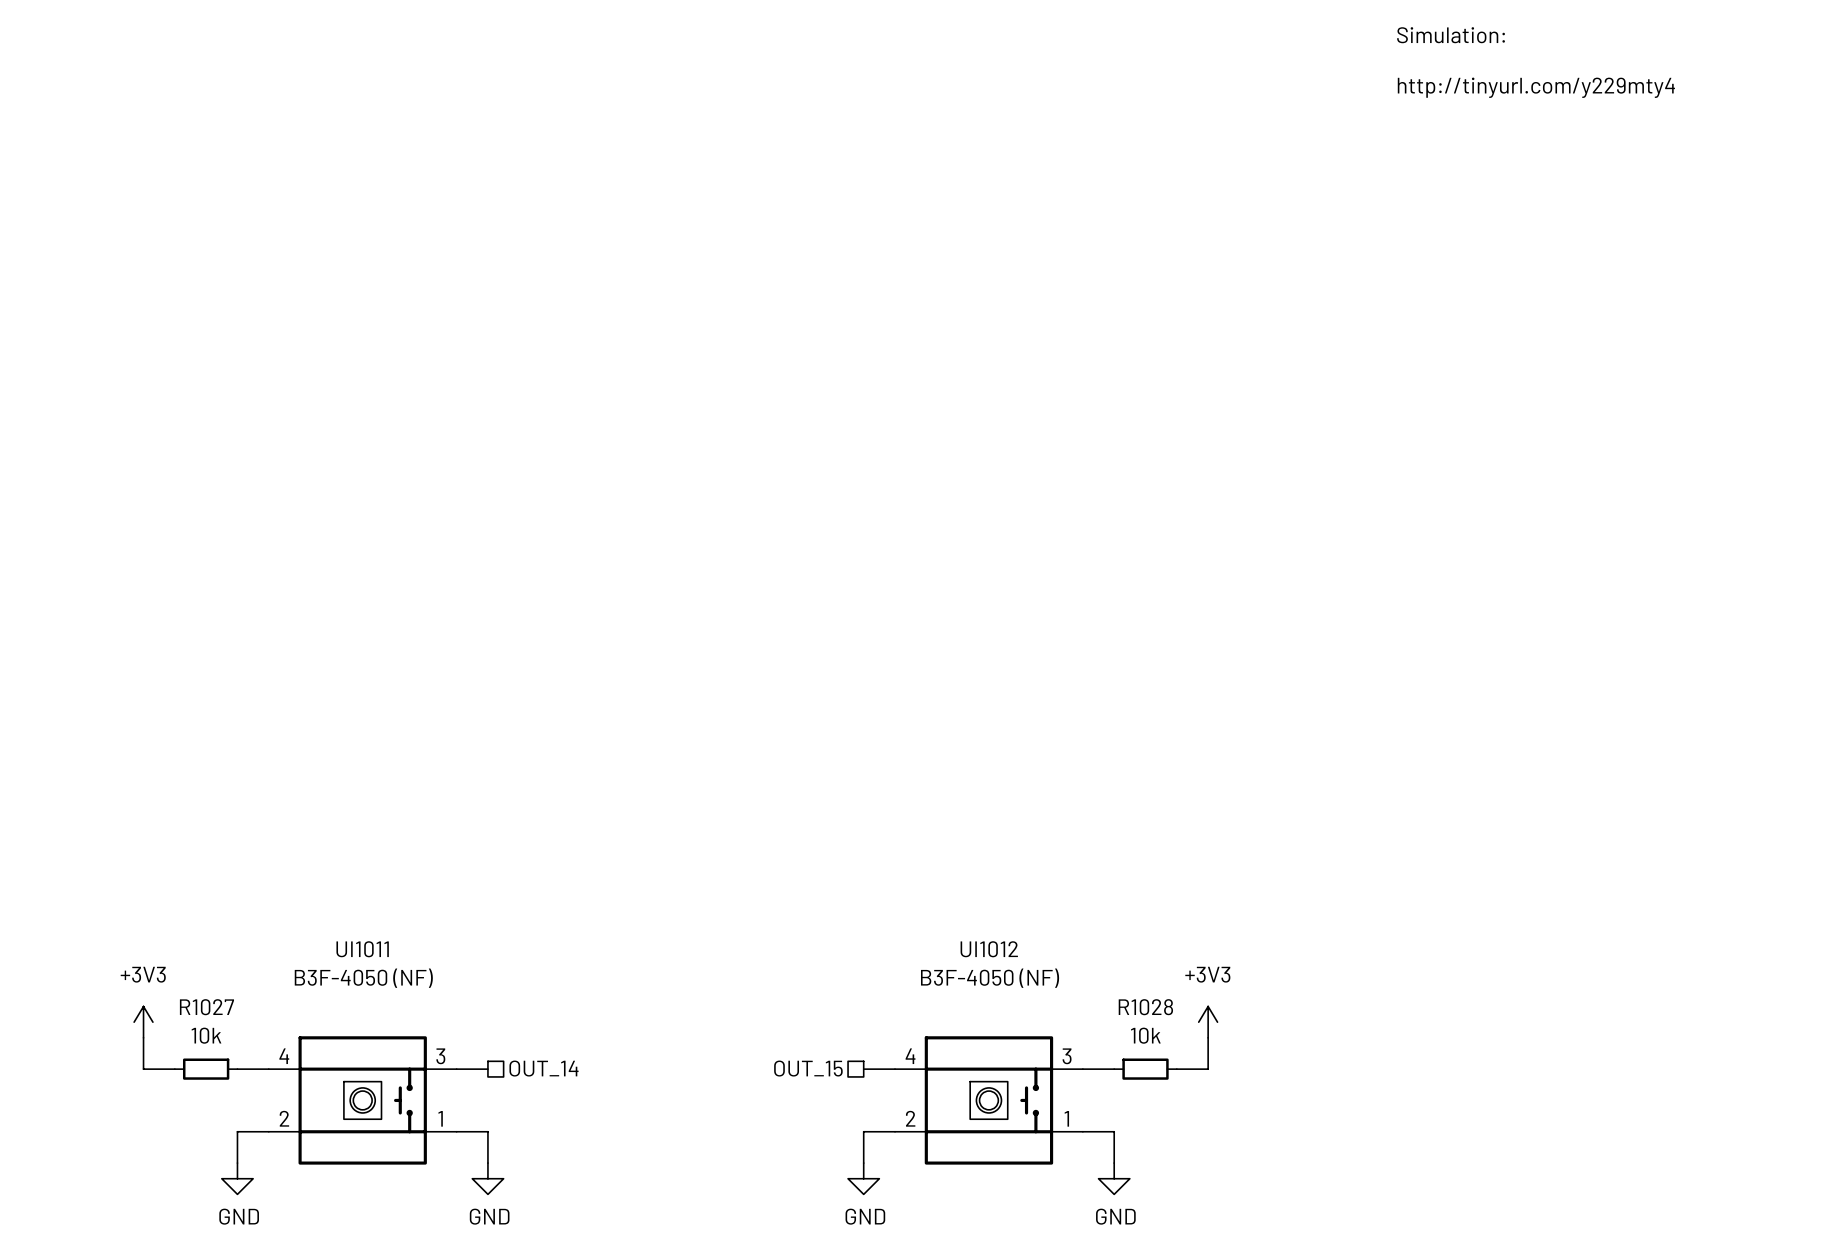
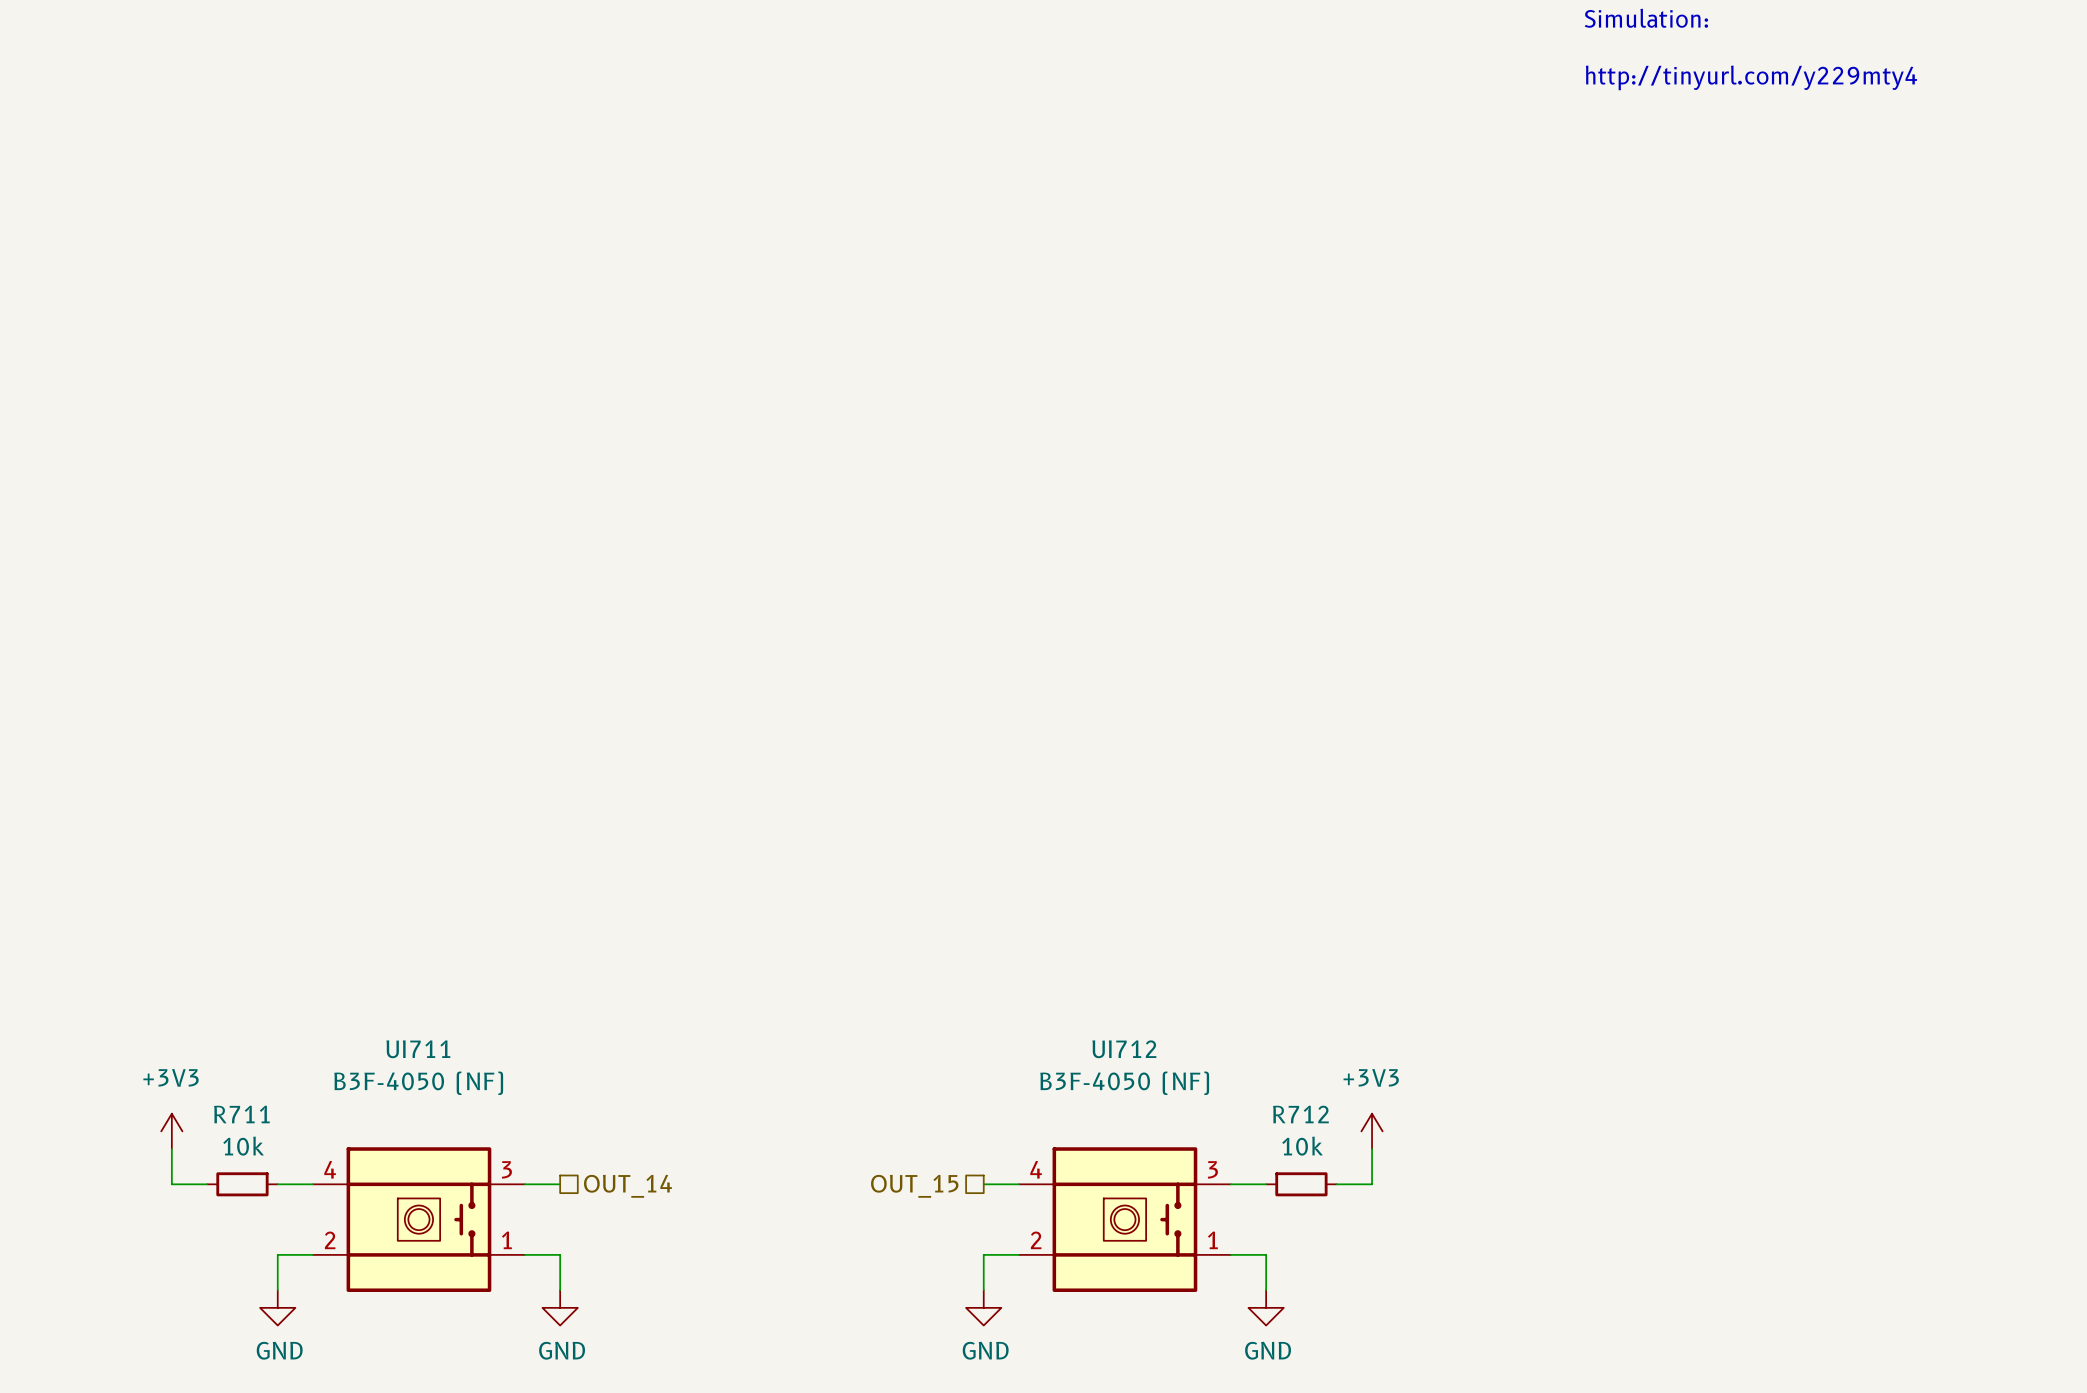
UI1011 name: UI1011 (362, 949) -> UI711 (418, 1049)
UI1012 name: UI1012 (989, 949) -> UI712 (1124, 1049)
R1027 name: R1027 (206, 1007) -> R711 (241, 1114)
R1028 name: R1028 (1145, 1007) -> R712 (1300, 1114)

